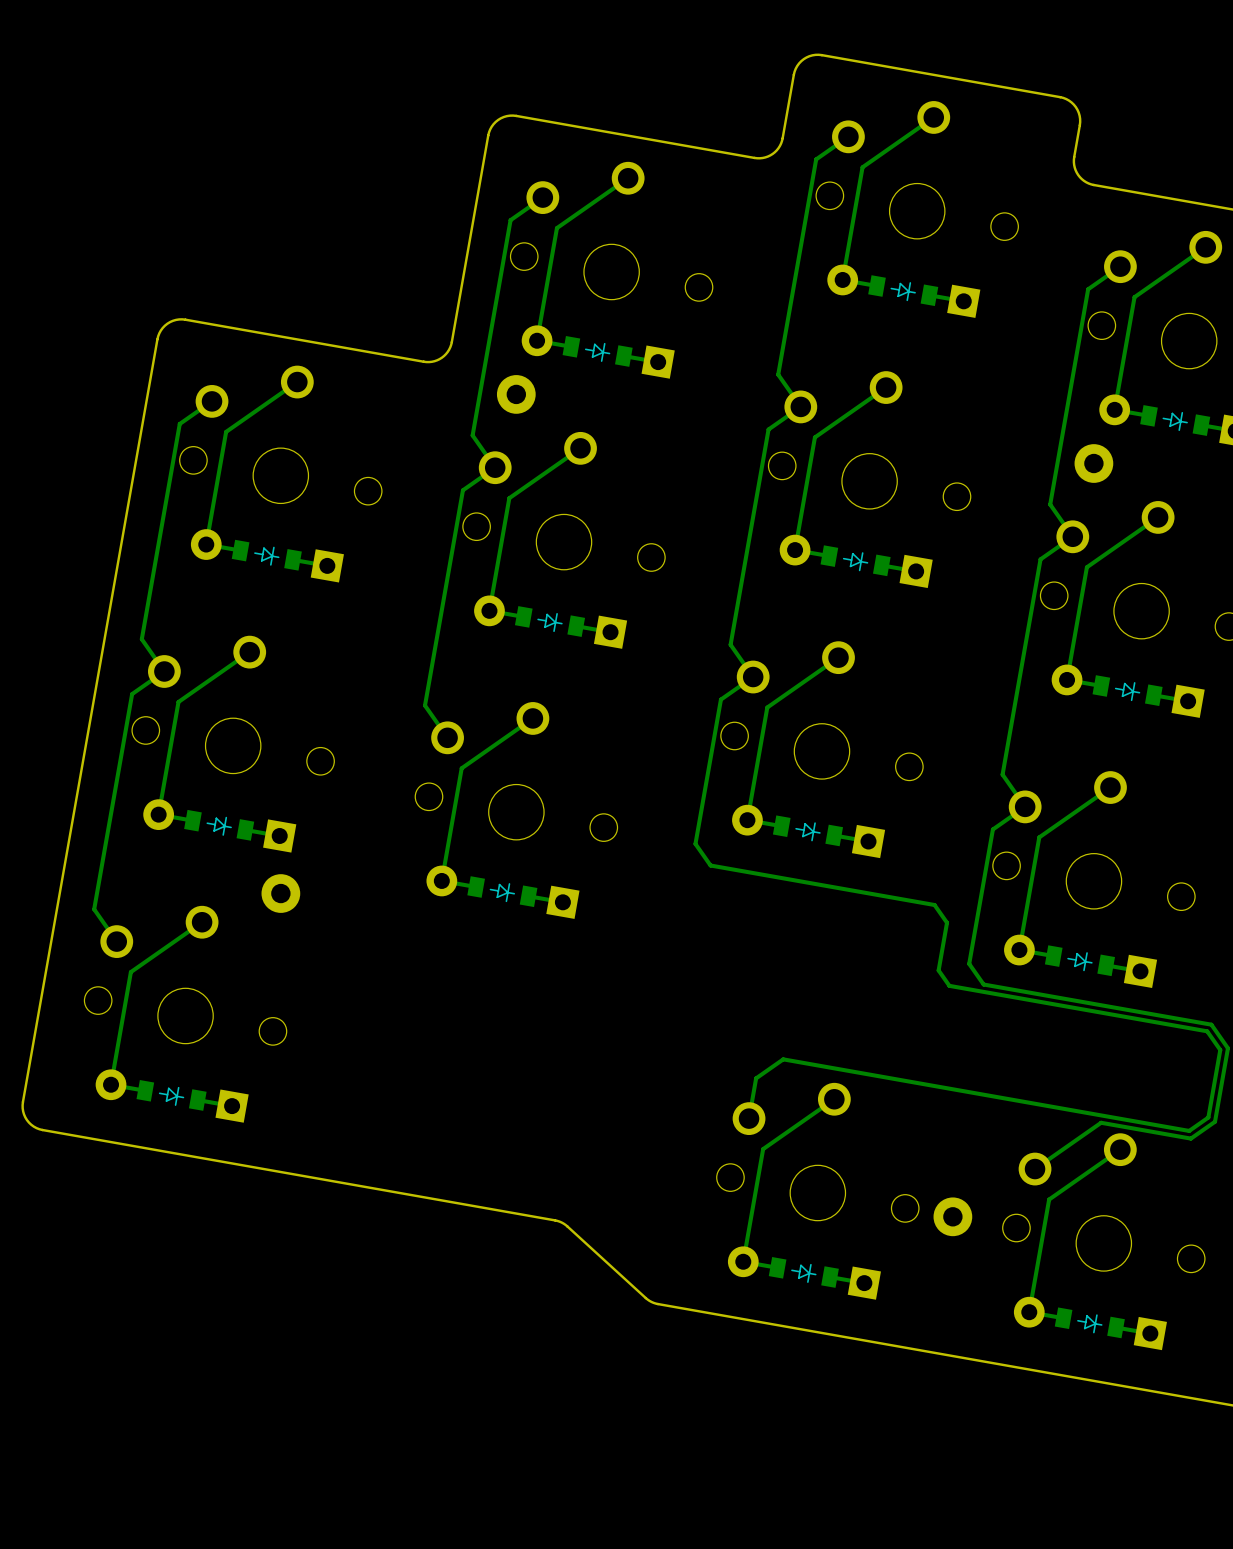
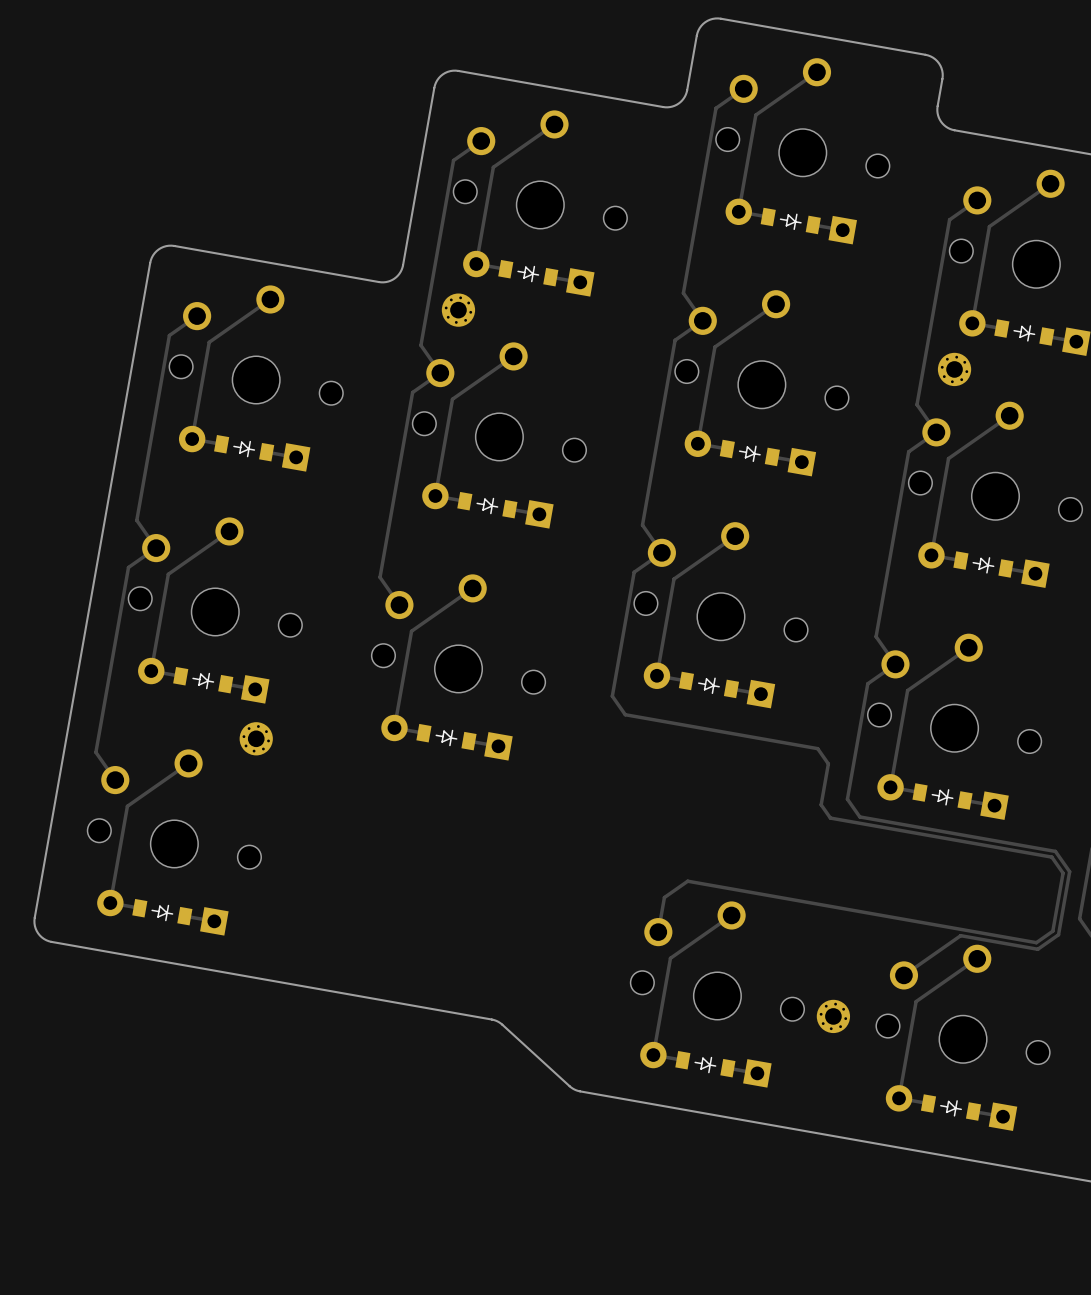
part footprint: [496, 375, 536, 414] -> [441, 293, 476, 327]
part footprint: [1074, 444, 1114, 483] -> [937, 352, 972, 387]
part footprint: [261, 874, 301, 913] -> [239, 722, 273, 756]
part footprint: [933, 1197, 973, 1237] -> [816, 999, 851, 1034]

